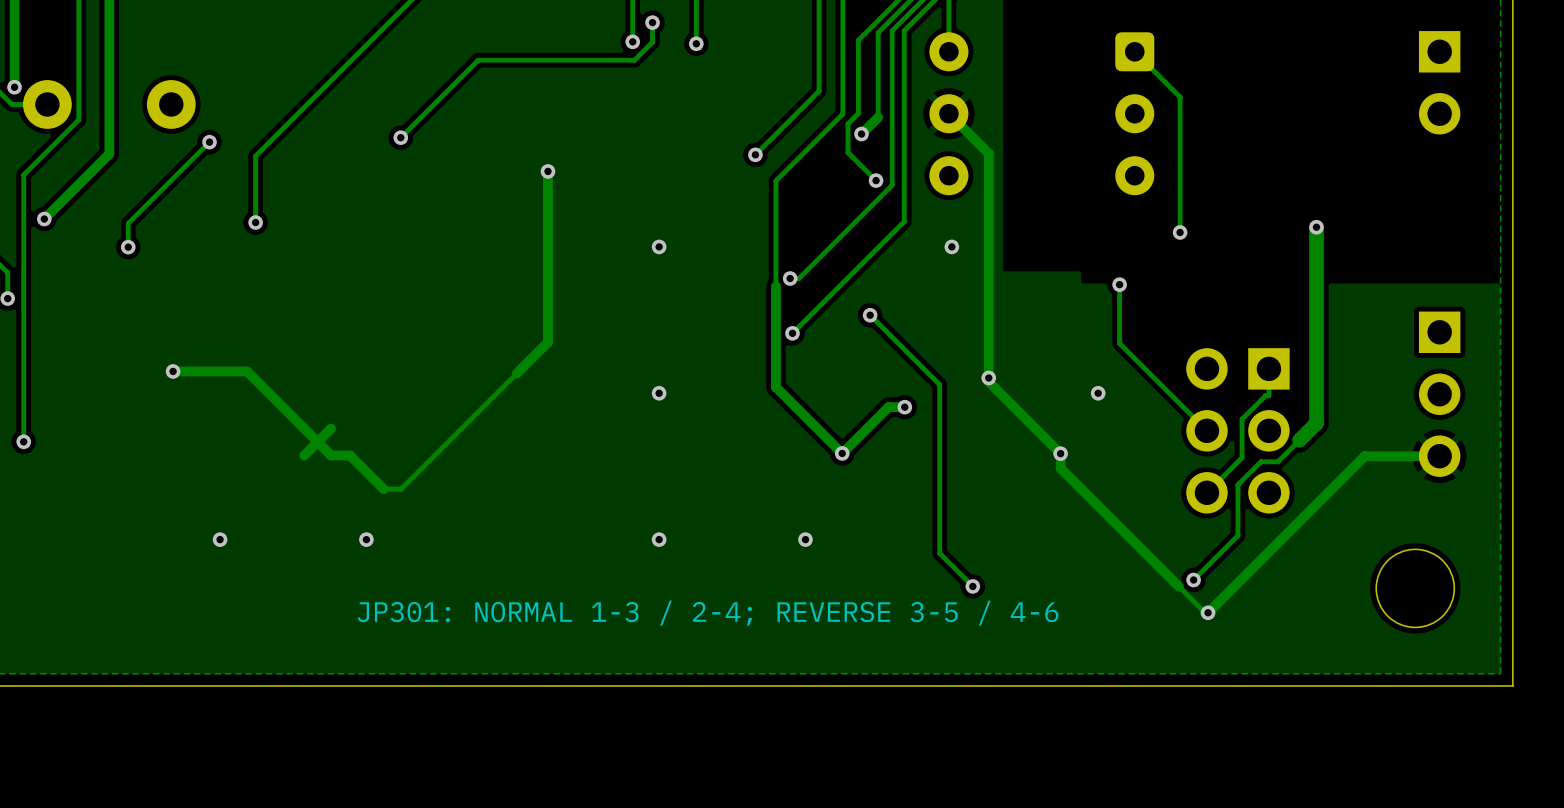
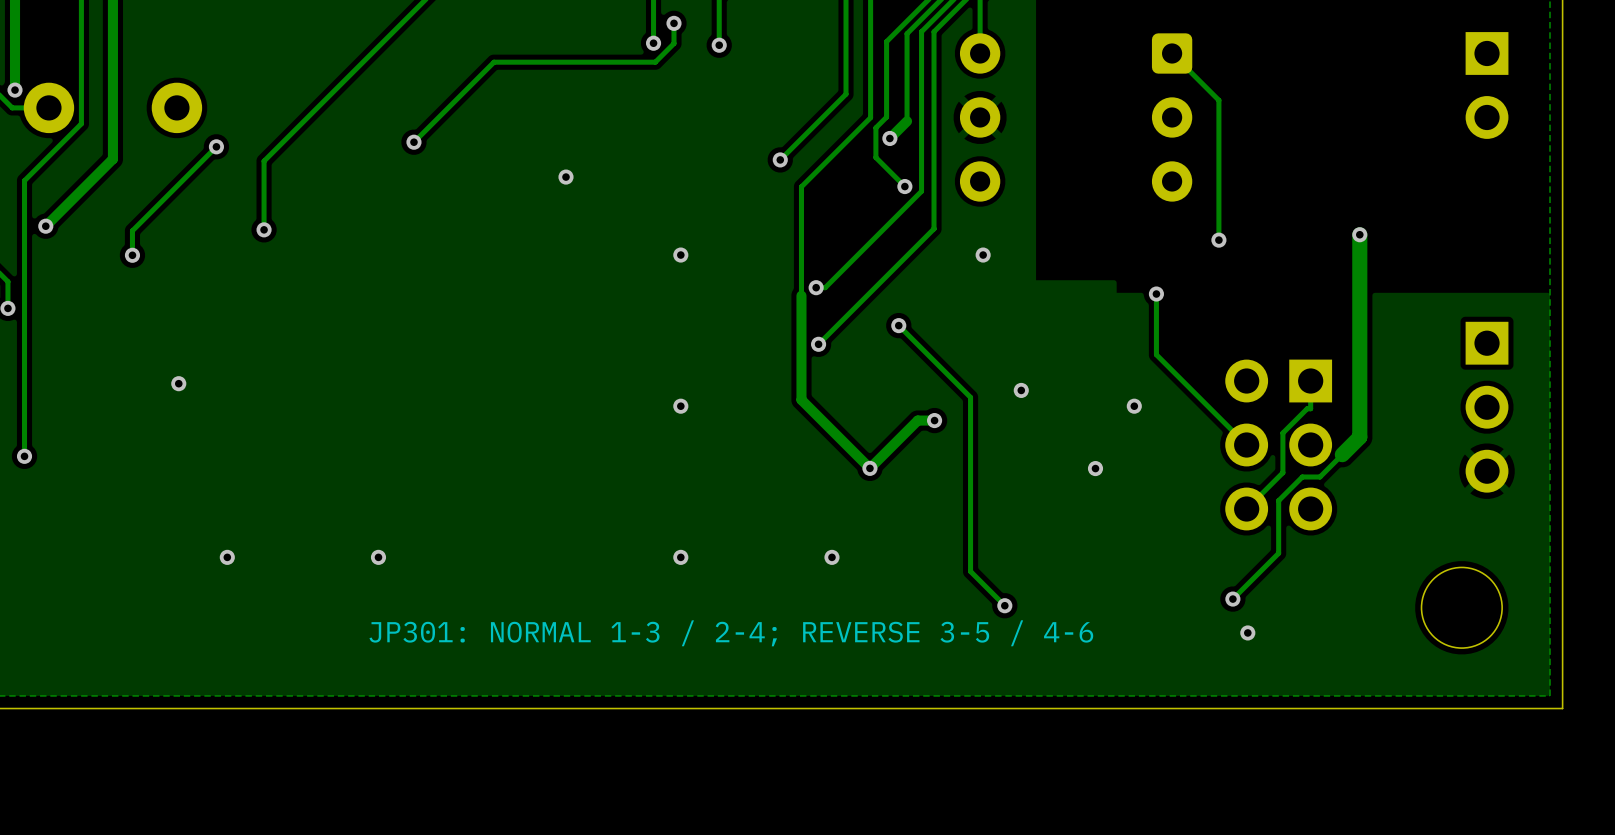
track: (948, 113) (988, 153) (988, 381) (1060, 453) (1060, 468) (1205, 612) (1208, 612) (1364, 456) (1439, 456) -> none
track: (547, 171) (547, 342) (401, 489) (383, 489) (350, 455) (331, 455) (247, 371) (173, 371) -> none
track: (331, 428) (304, 455) -> none

